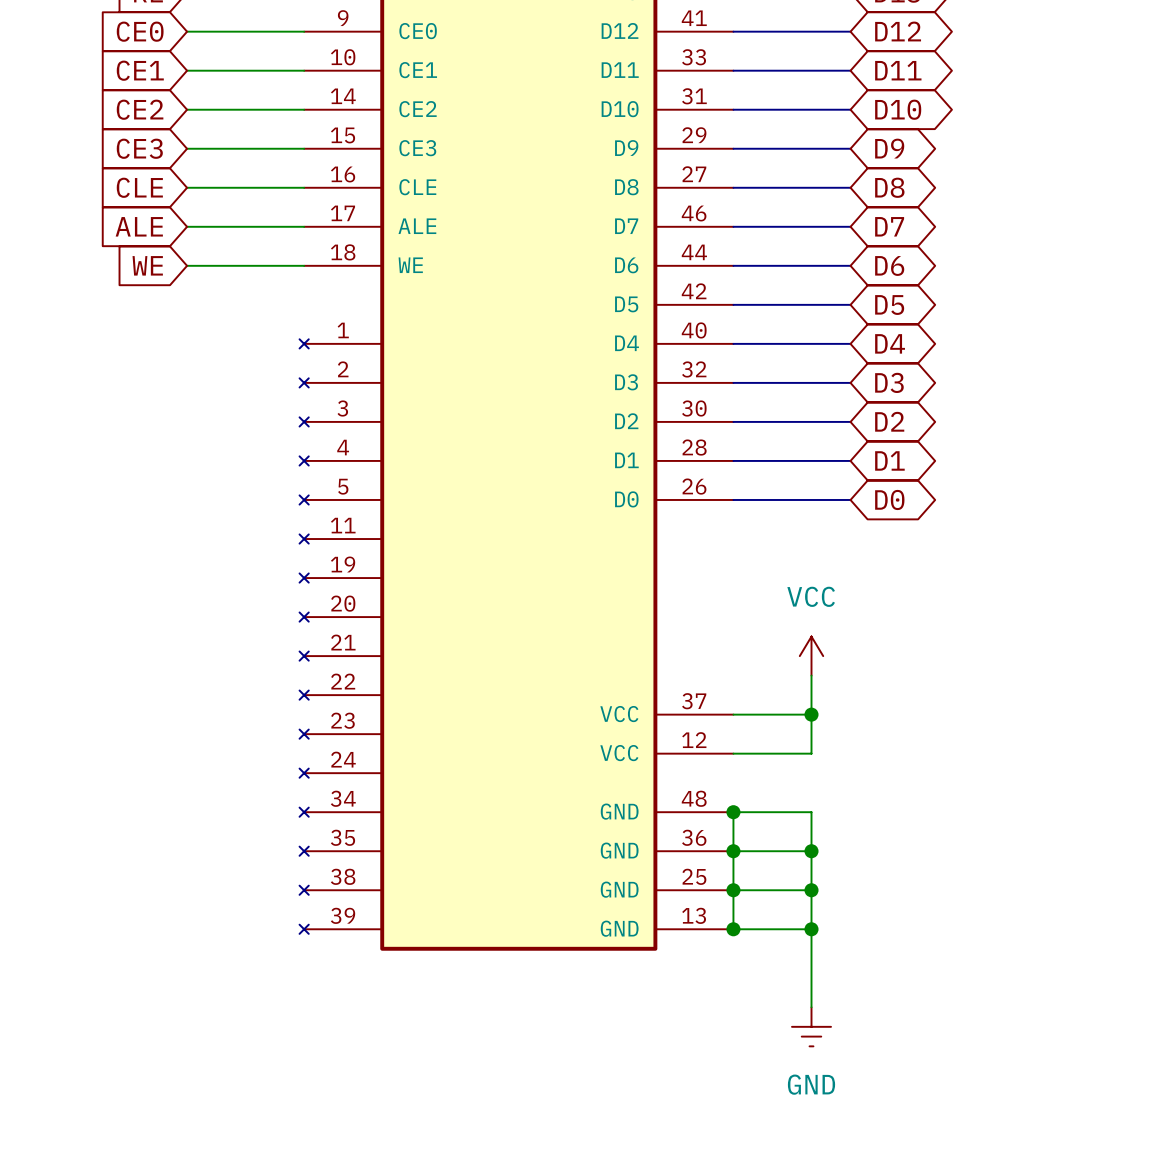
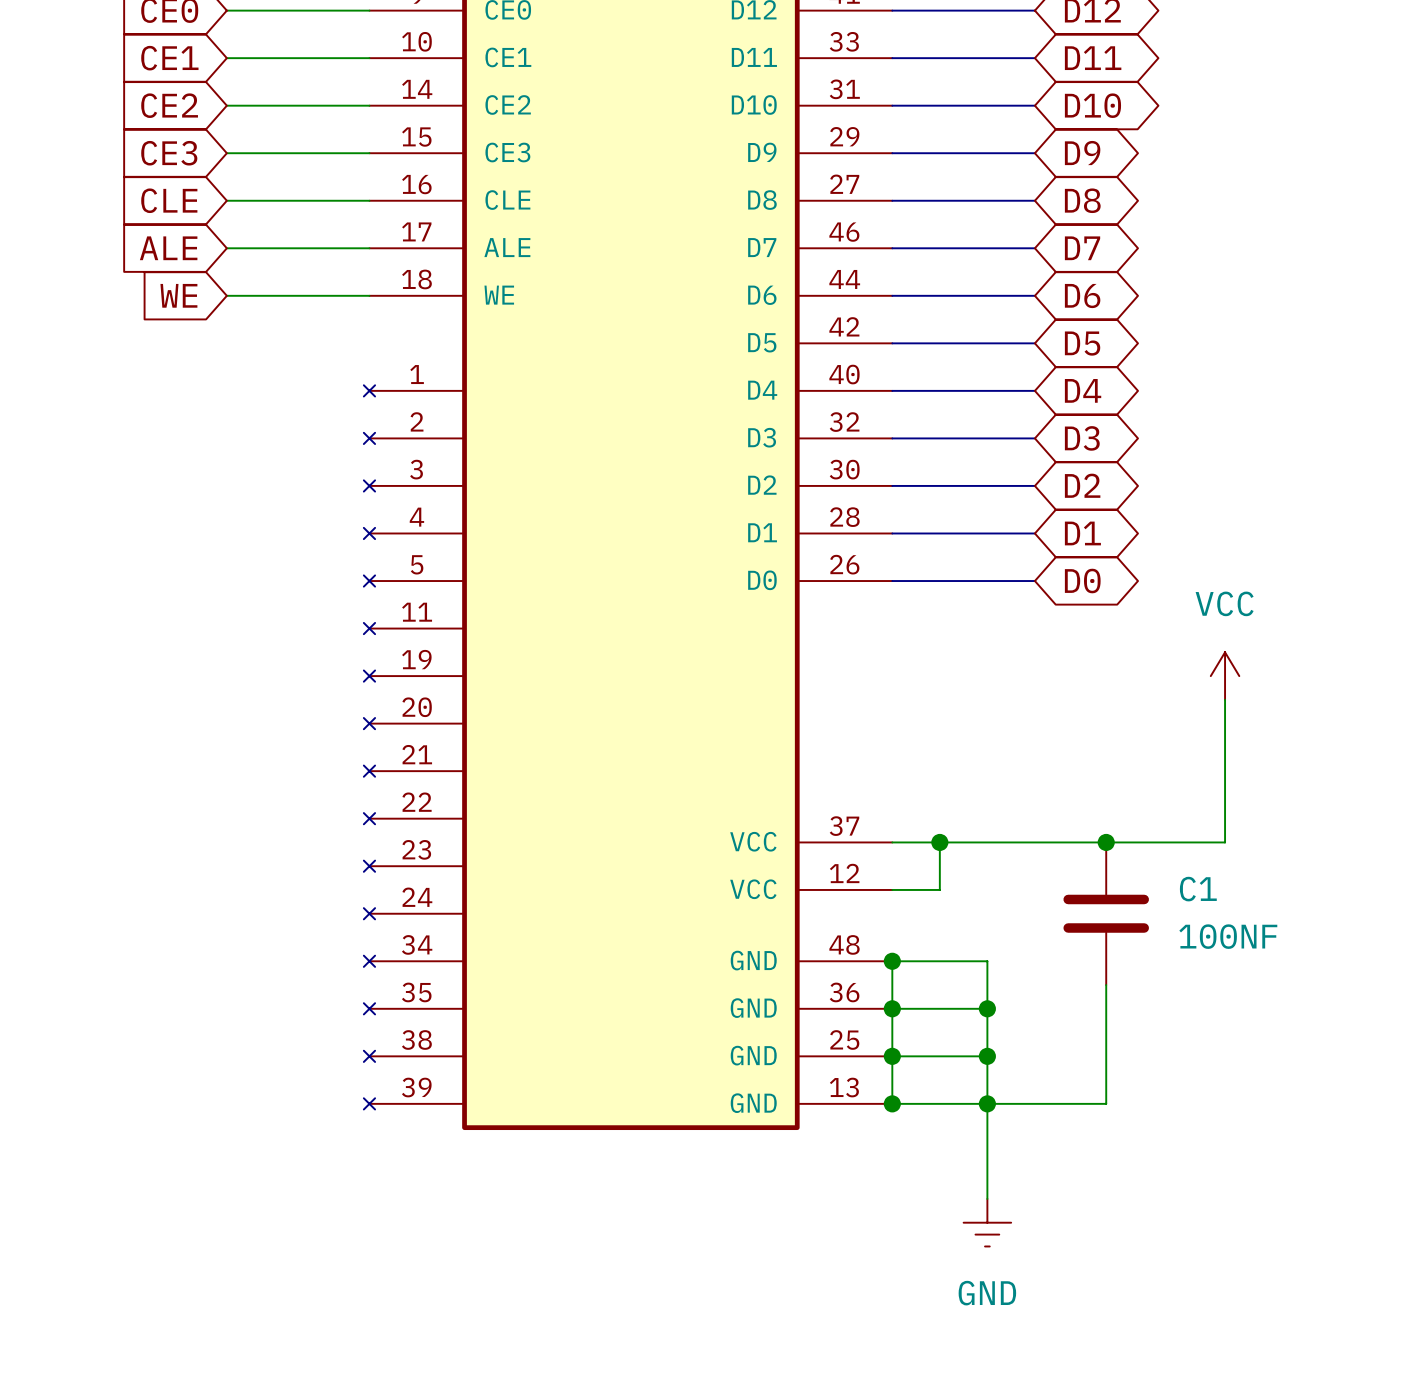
wire: none -> (1225, 699) (1225, 842) (987, 842)
power symbol position: VCC (811, 656) -> VCC (1225, 676)
wire: (811, 675) (811, 753) (772, 753) -> (939, 842) (939, 889)
junction position: (811, 714) -> (939, 842)
junction: none -> (1106, 842)
C1: none -> 100NF (1106, 913)
wire: none -> (1106, 985) (1106, 1103) (987, 1103)

